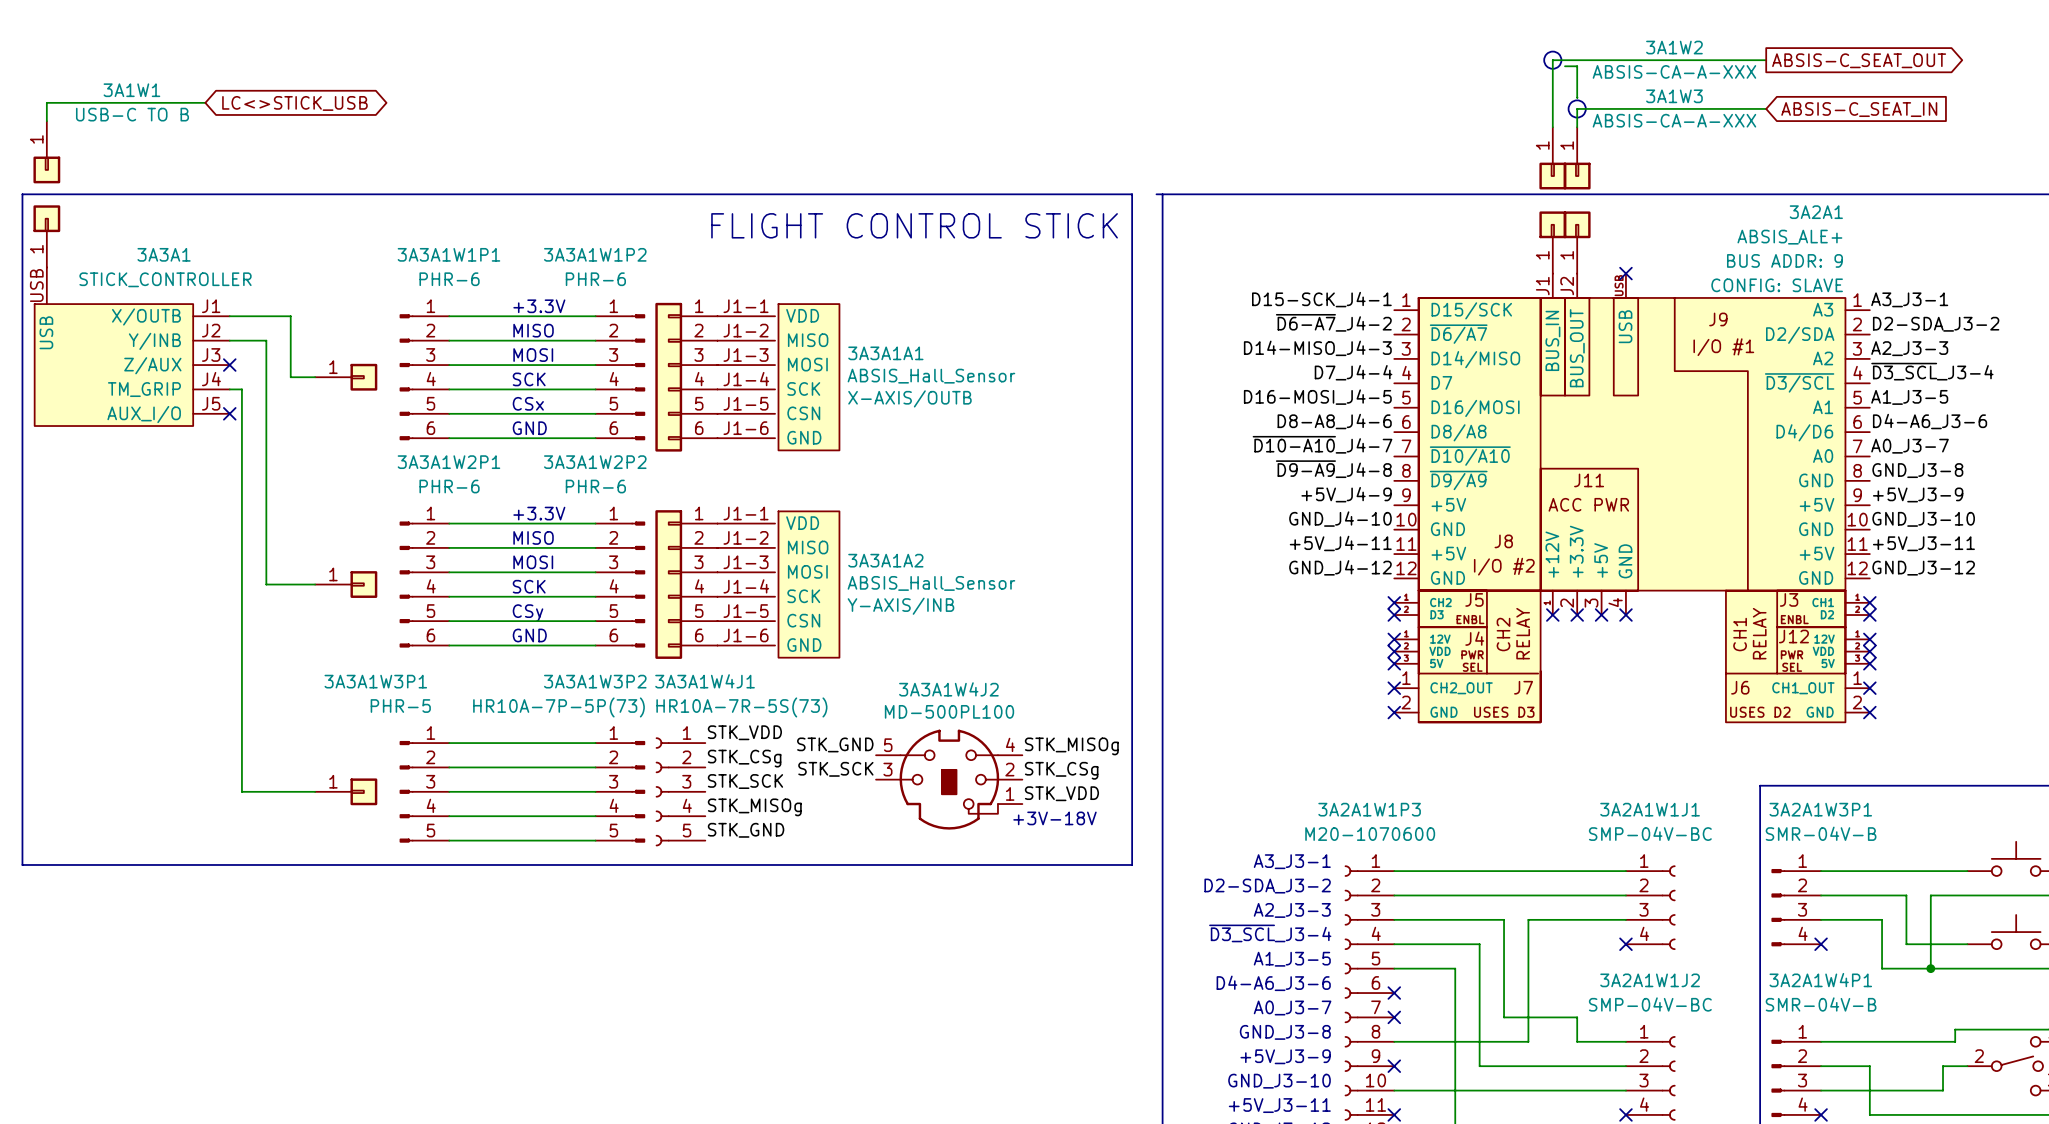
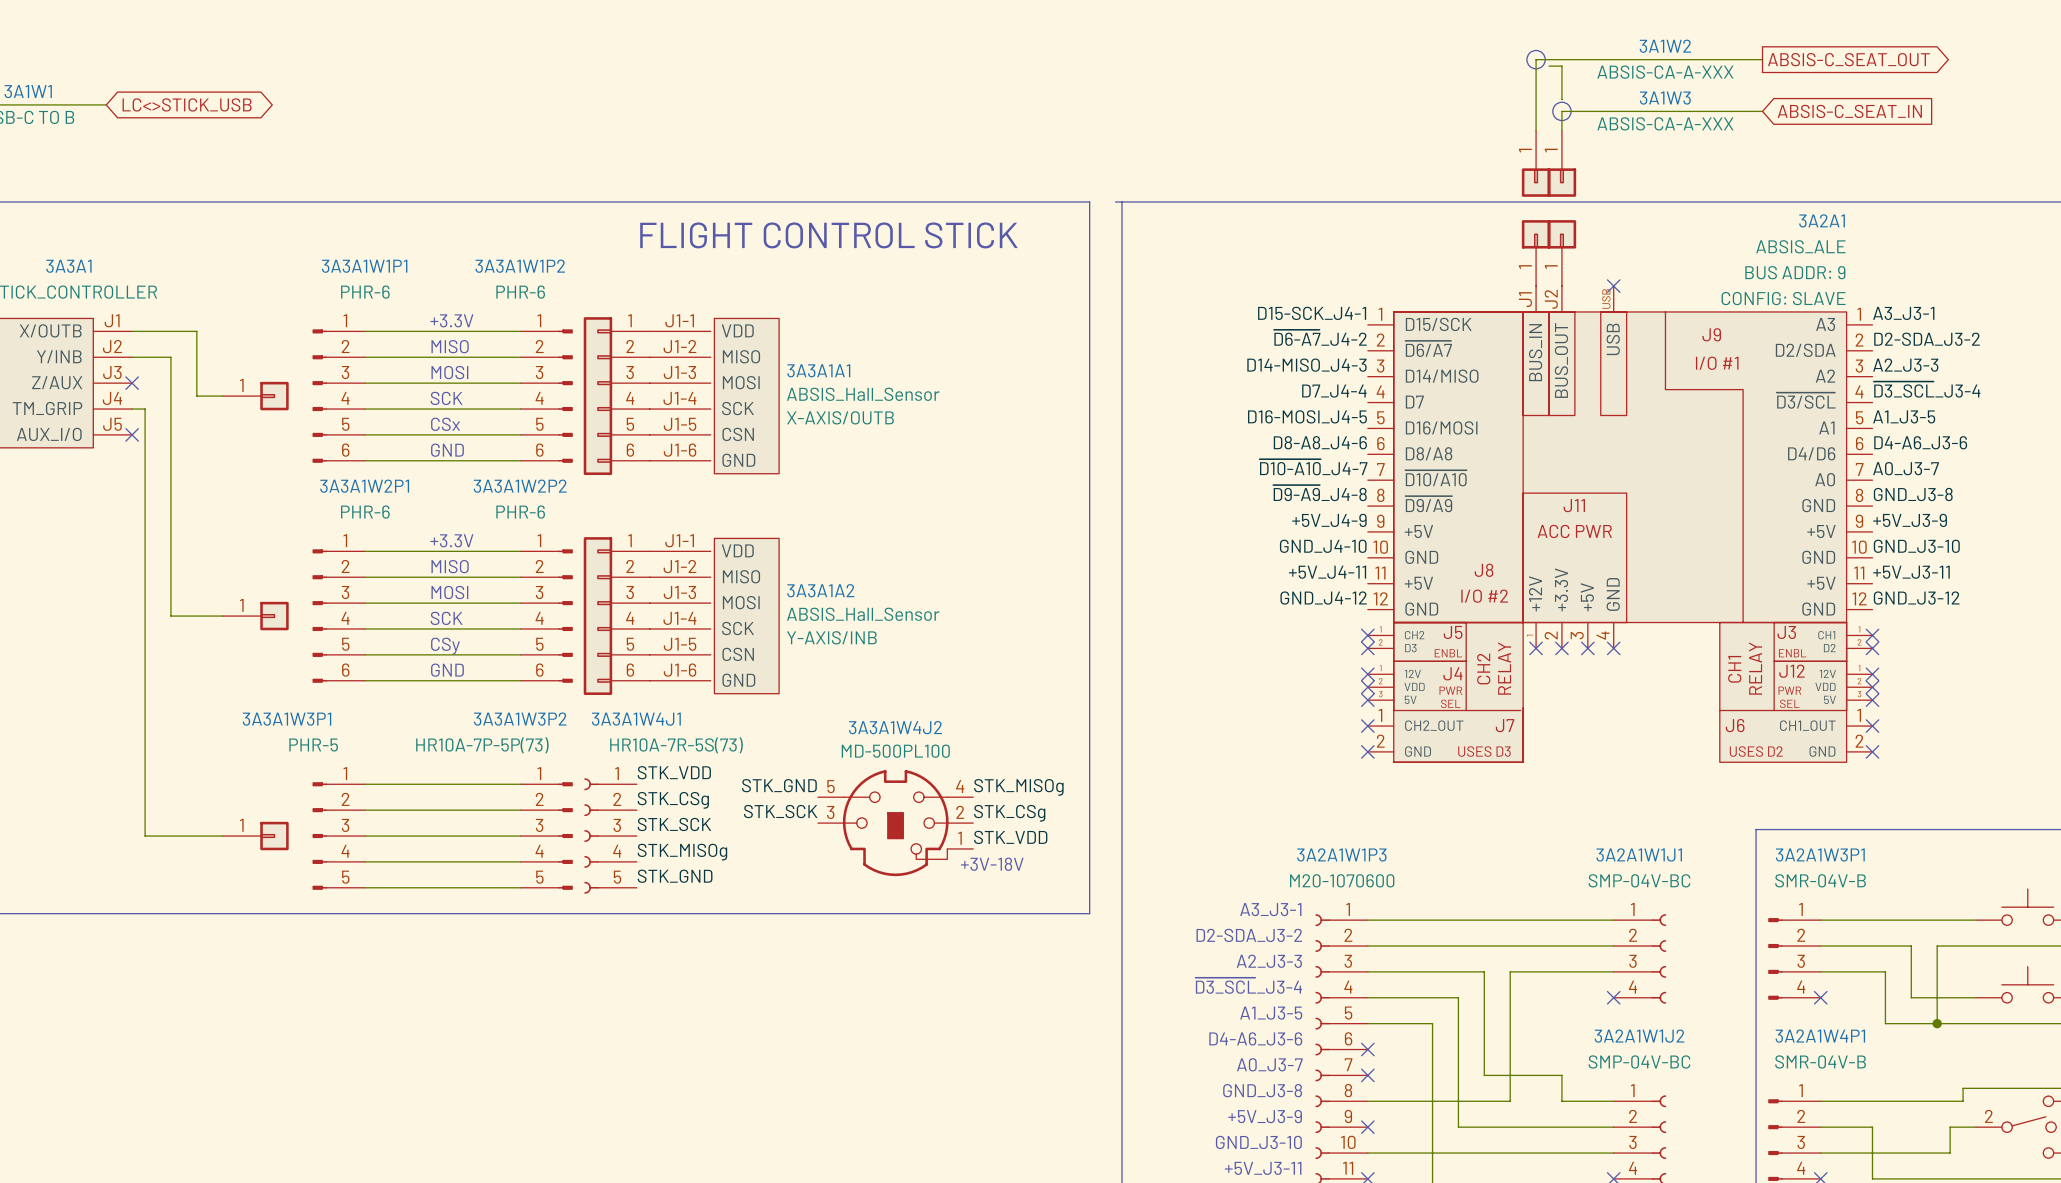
3A2A1 value: ABSIS_ALE+ (1789, 237) -> ABSIS_ALE (1800, 246)

